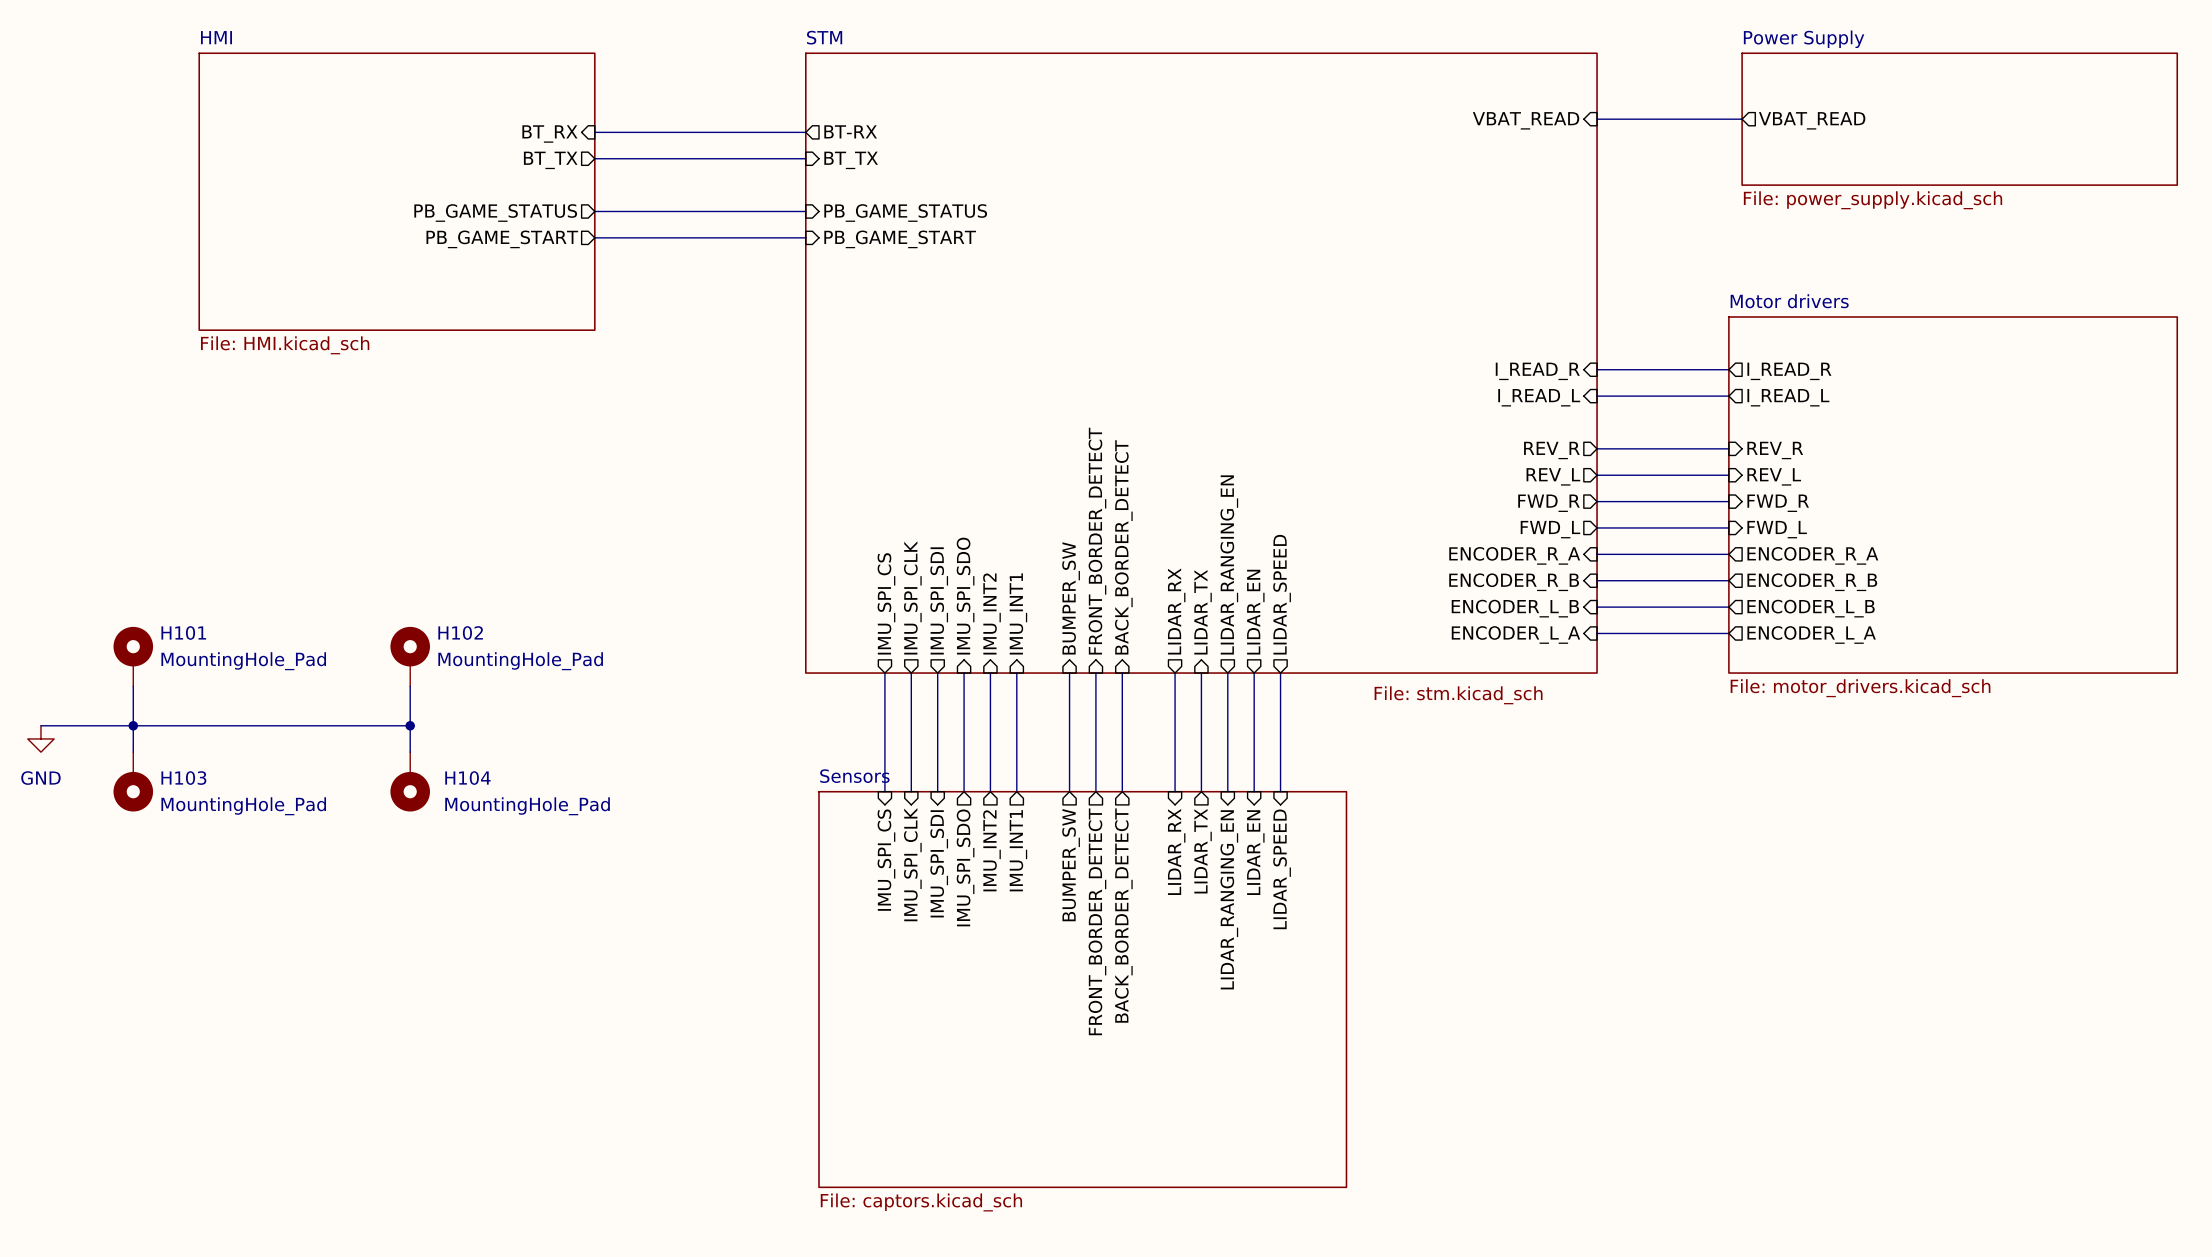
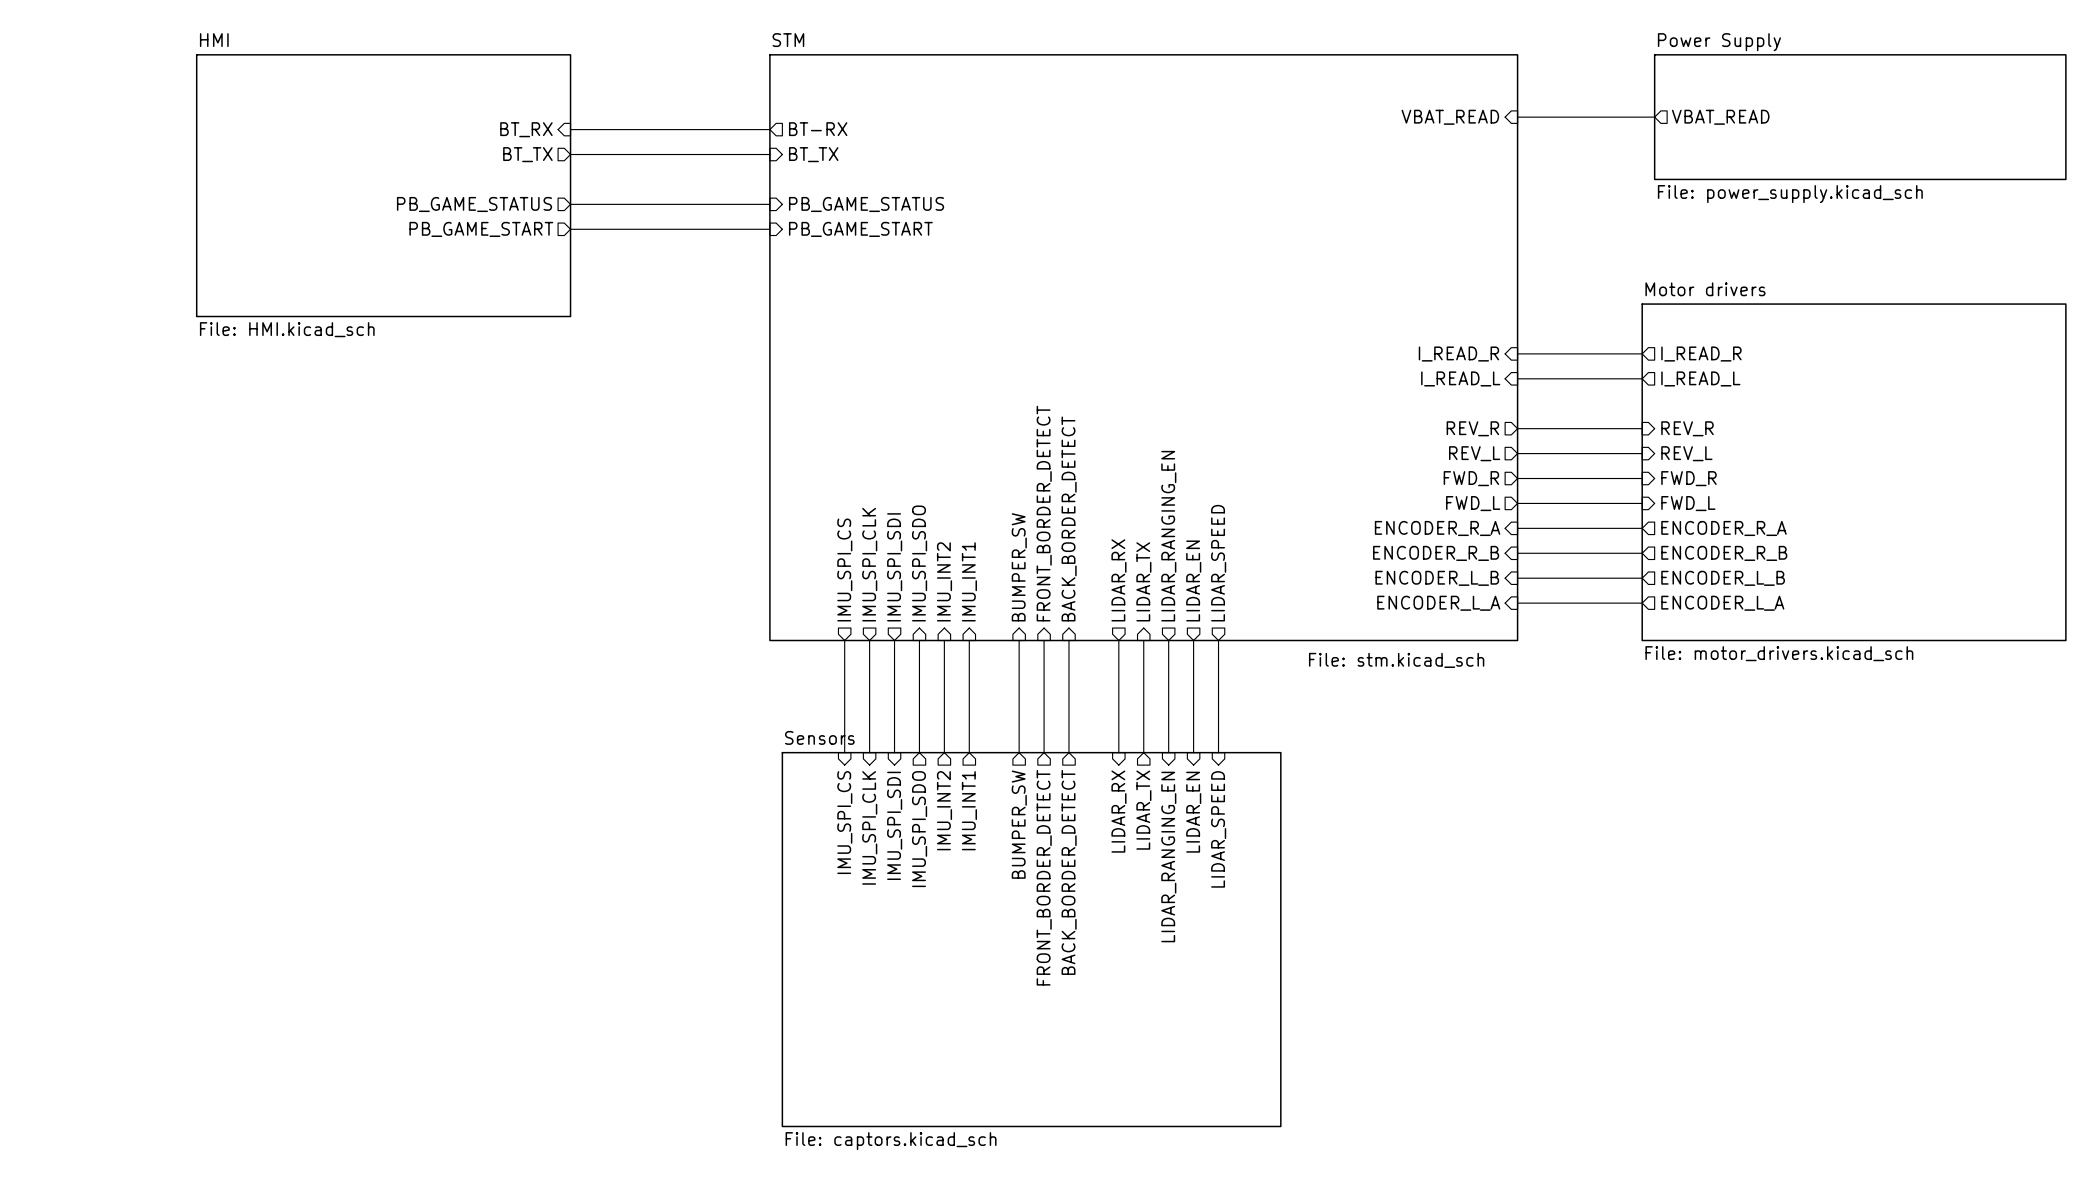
H101: MountingHole_Pad (133, 656) -> none
H102: MountingHole_Pad (410, 656) -> none
wire: (133, 686) (133, 752) -> none
wire: (410, 686) (410, 752) -> none
wire: (40, 725) (410, 725) -> none
junction: (133, 725) -> none
junction: (410, 725) -> none
power symbol: GND (40, 738) -> none
H103: MountingHole_Pad (133, 781) -> none
H104: MountingHole_Pad (410, 781) -> none

